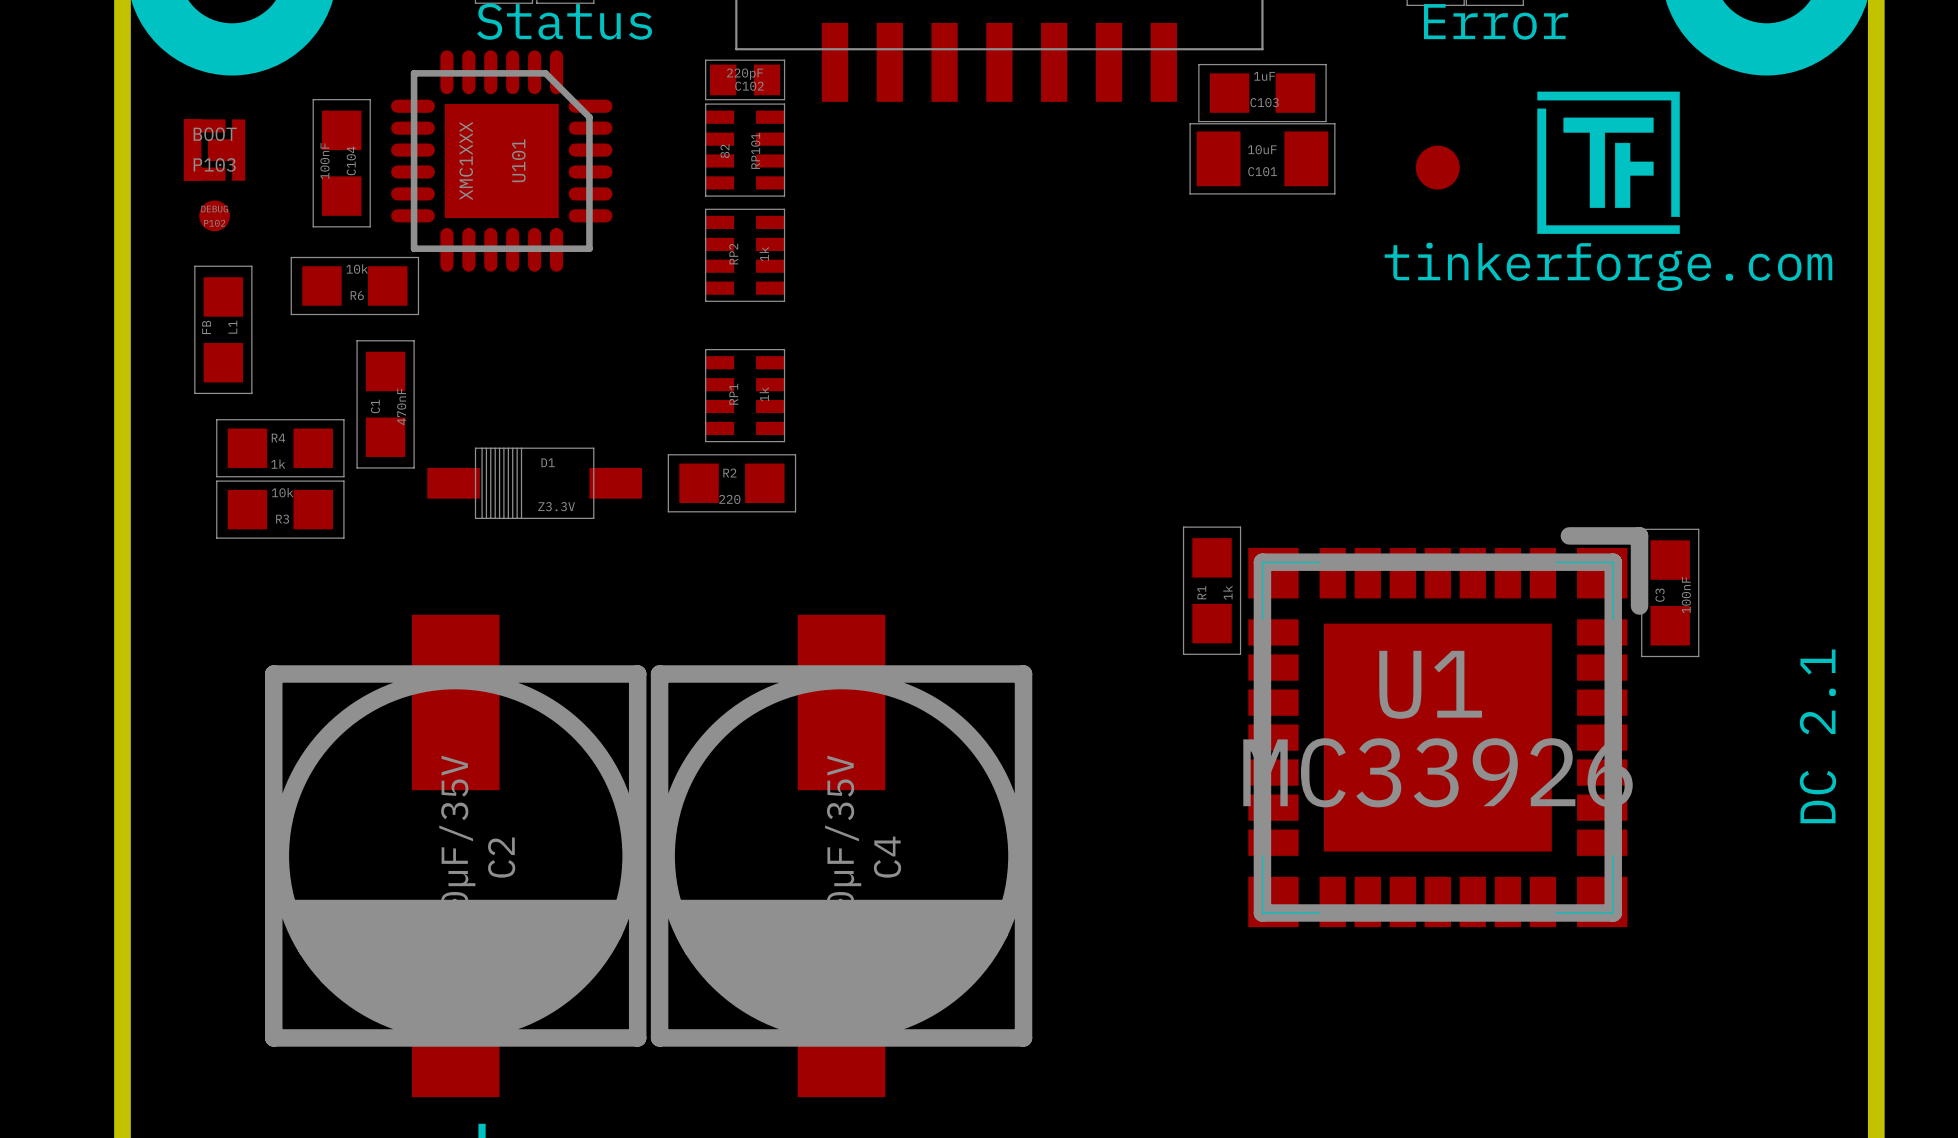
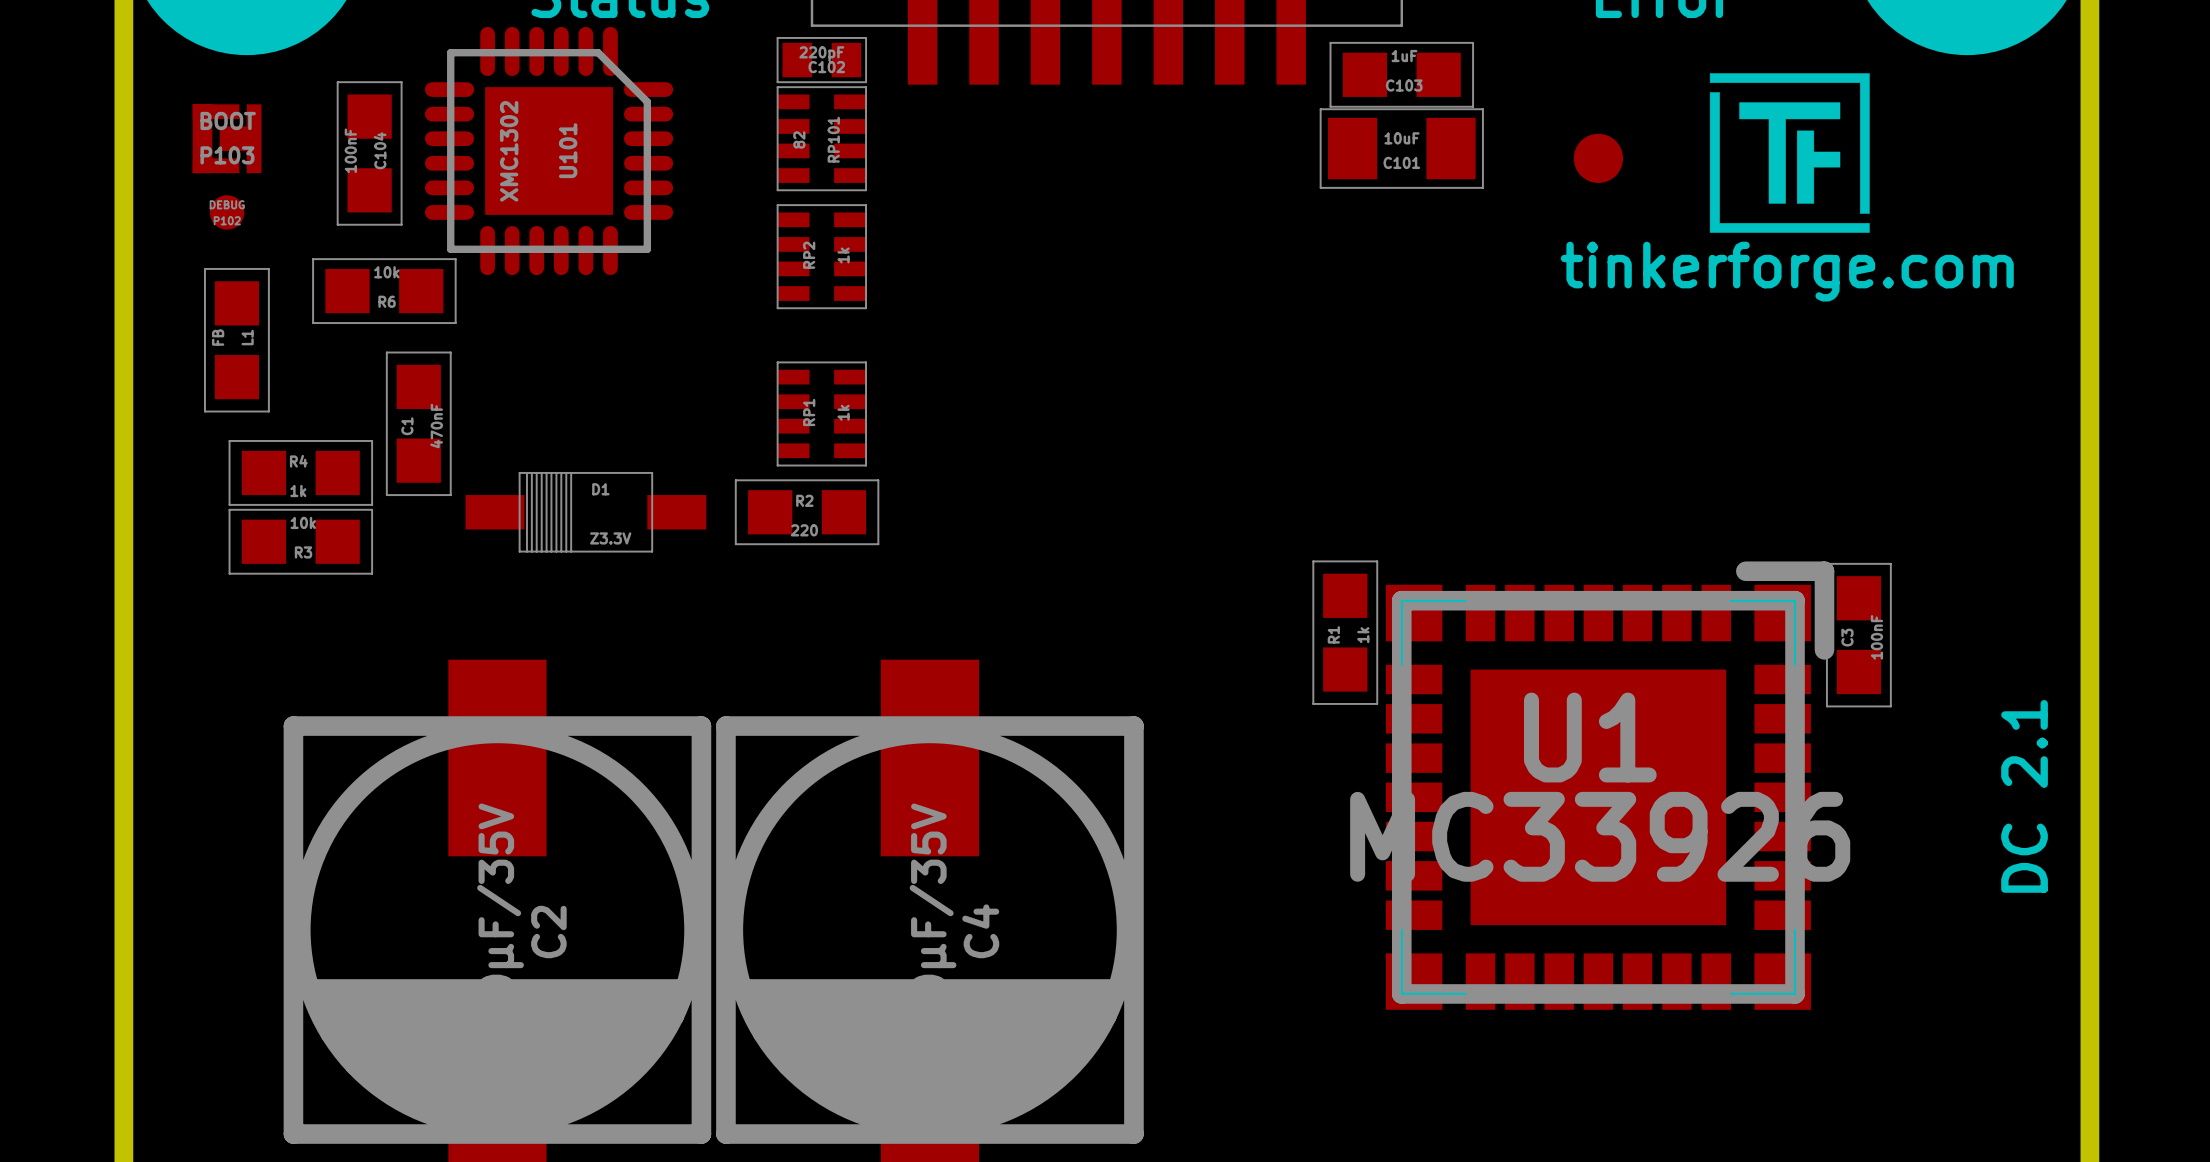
U101 value: XMC1XXX (466, 161) -> XMC1302 (509, 151)

